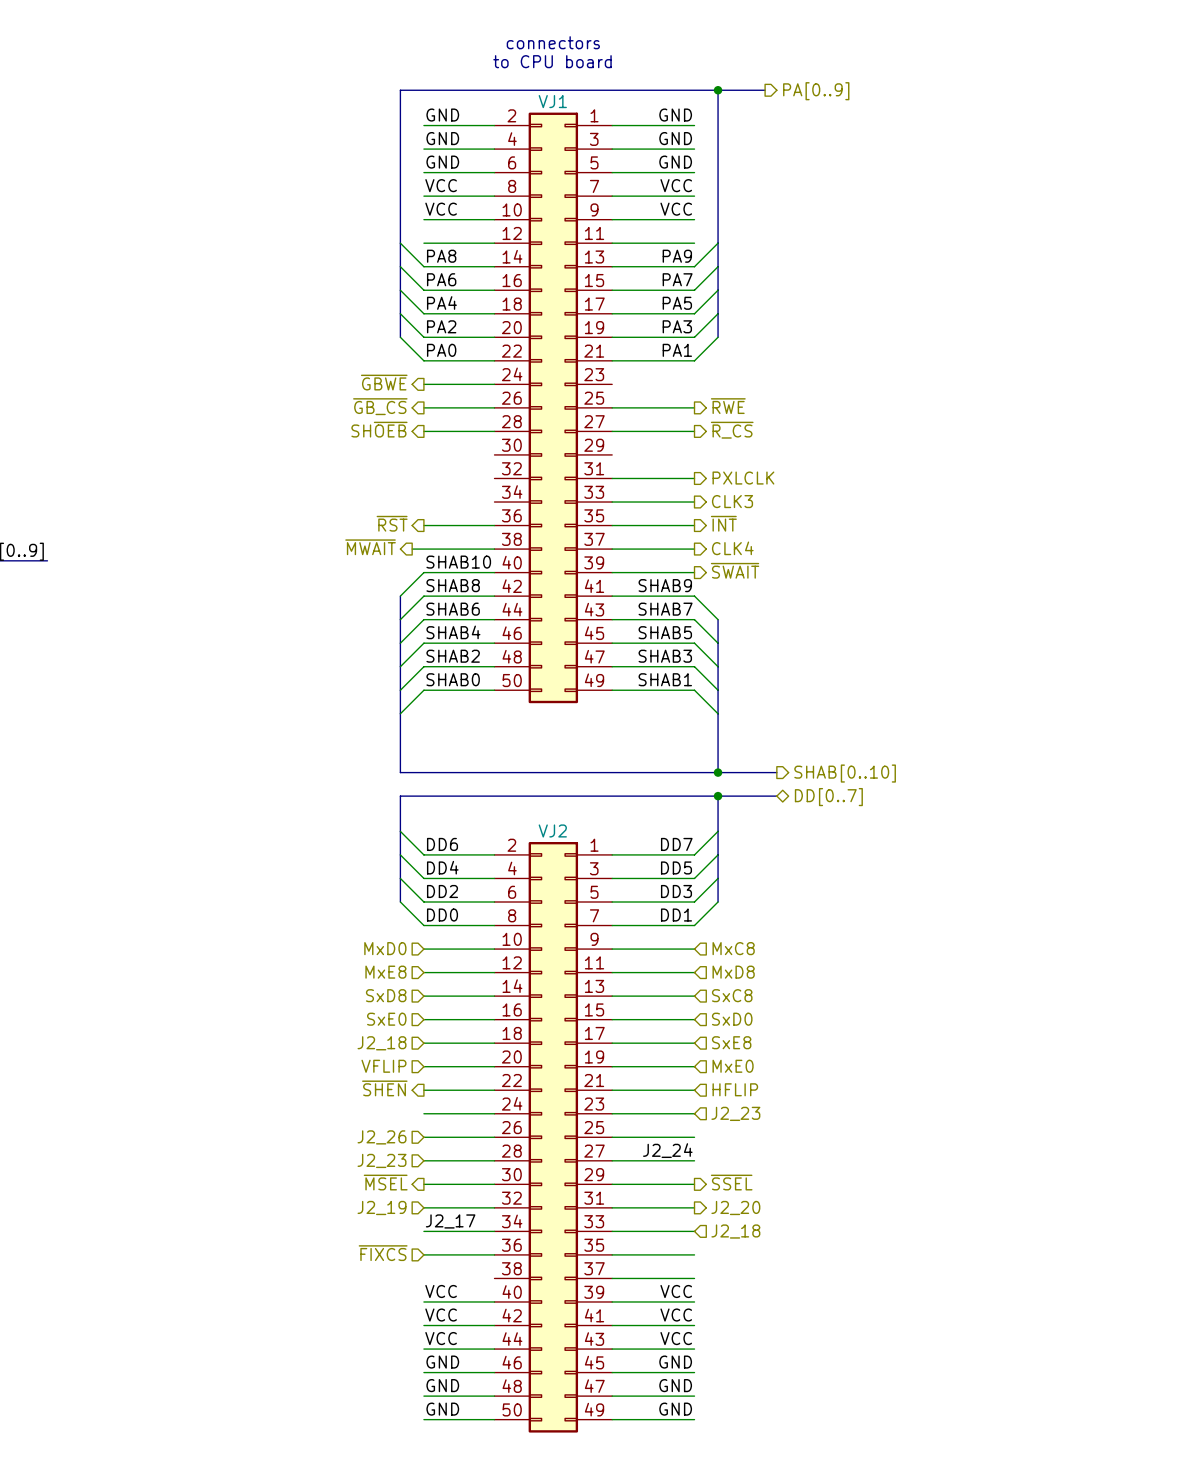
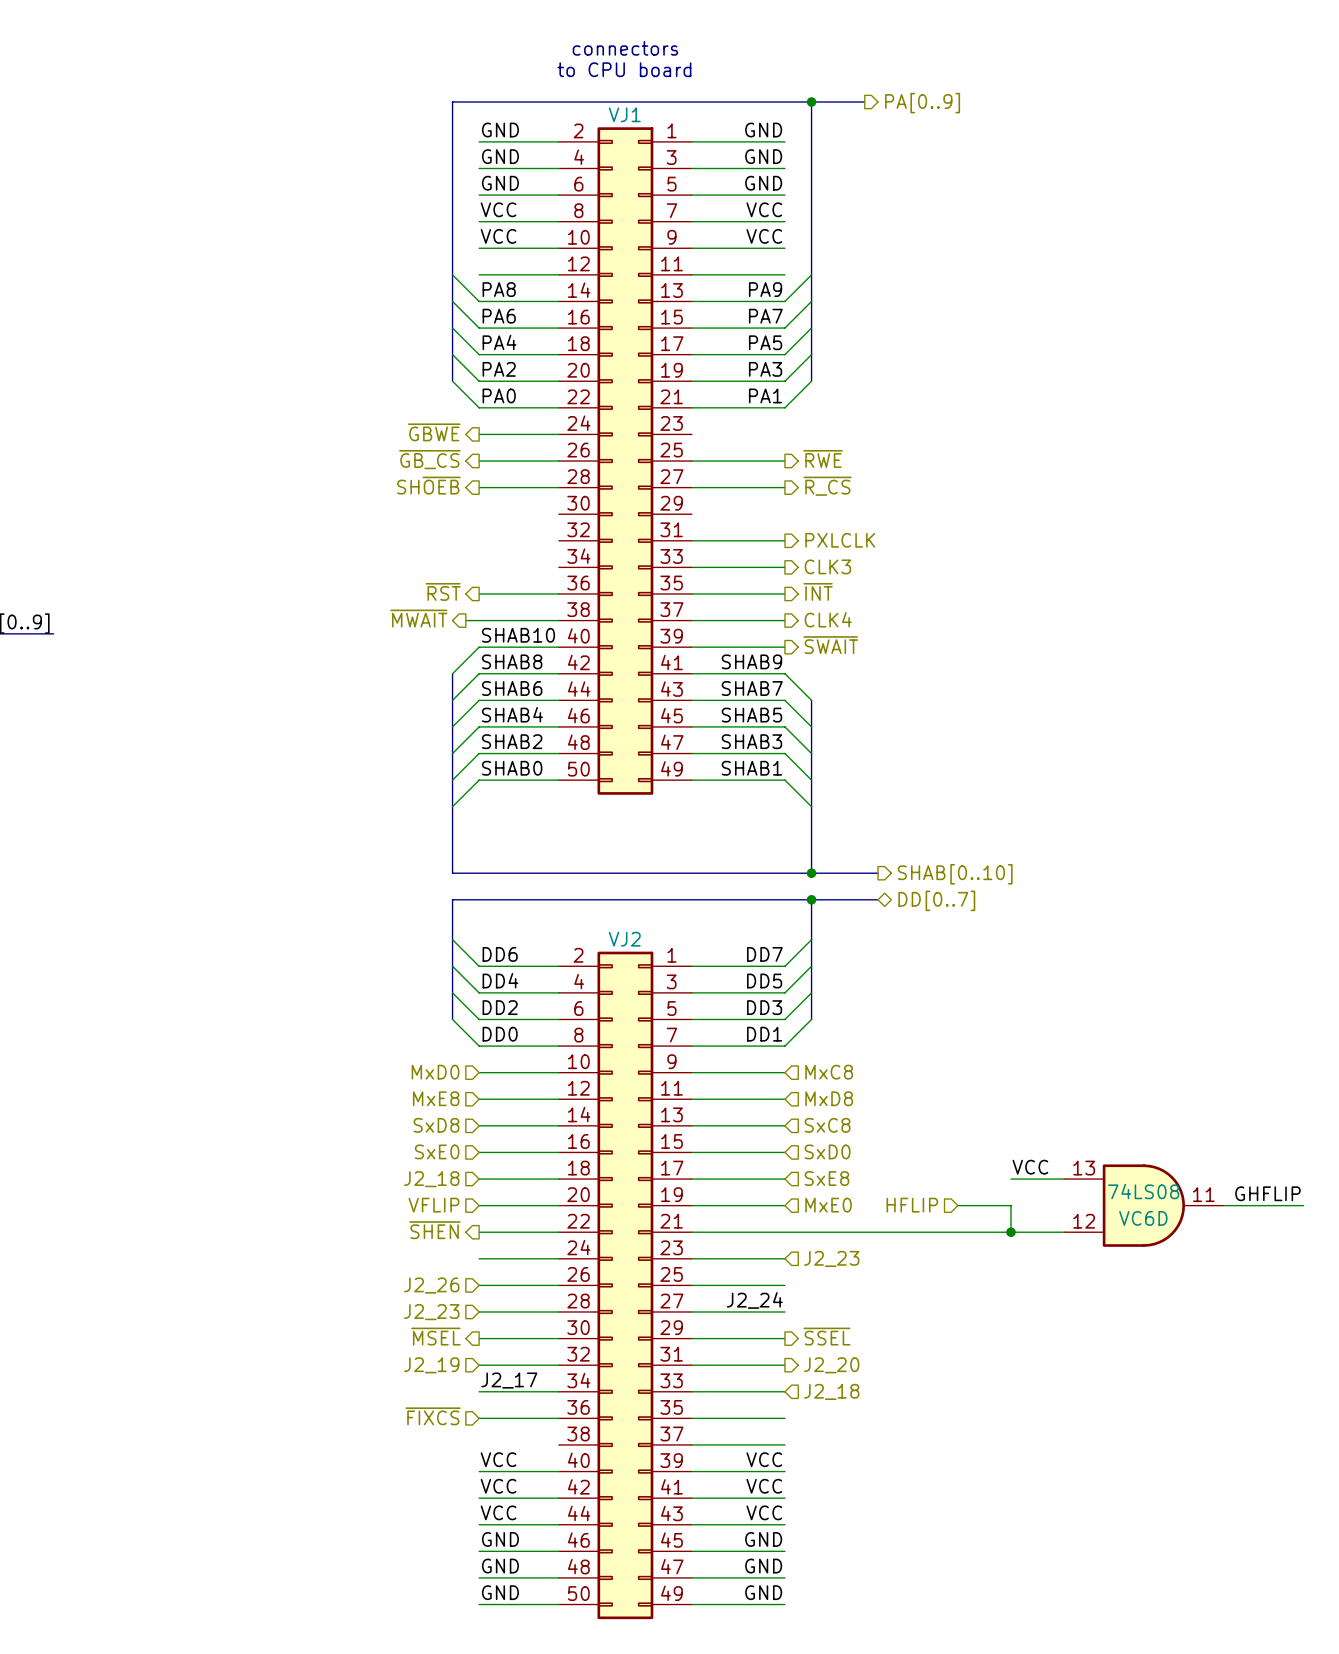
label: none -> VCC (1030, 1167)
wire: none -> (1011, 1179) (1064, 1179)
label: none -> GHFLIP (1267, 1193)
wire: none -> (957, 1205) (1011, 1205) (1011, 1232)
VC6D: none -> 74LS08 (1143, 1205)
wire: none -> (1223, 1205) (1303, 1205)
hierarchical label rotation: 0° (735, 1089) -> 180° (912, 1205)
hierarchical label position: HFLIP (735, 1089) -> HFLIP (912, 1205)
wire: none -> (784, 1232) (1064, 1232)
junction: none -> (1011, 1232)

